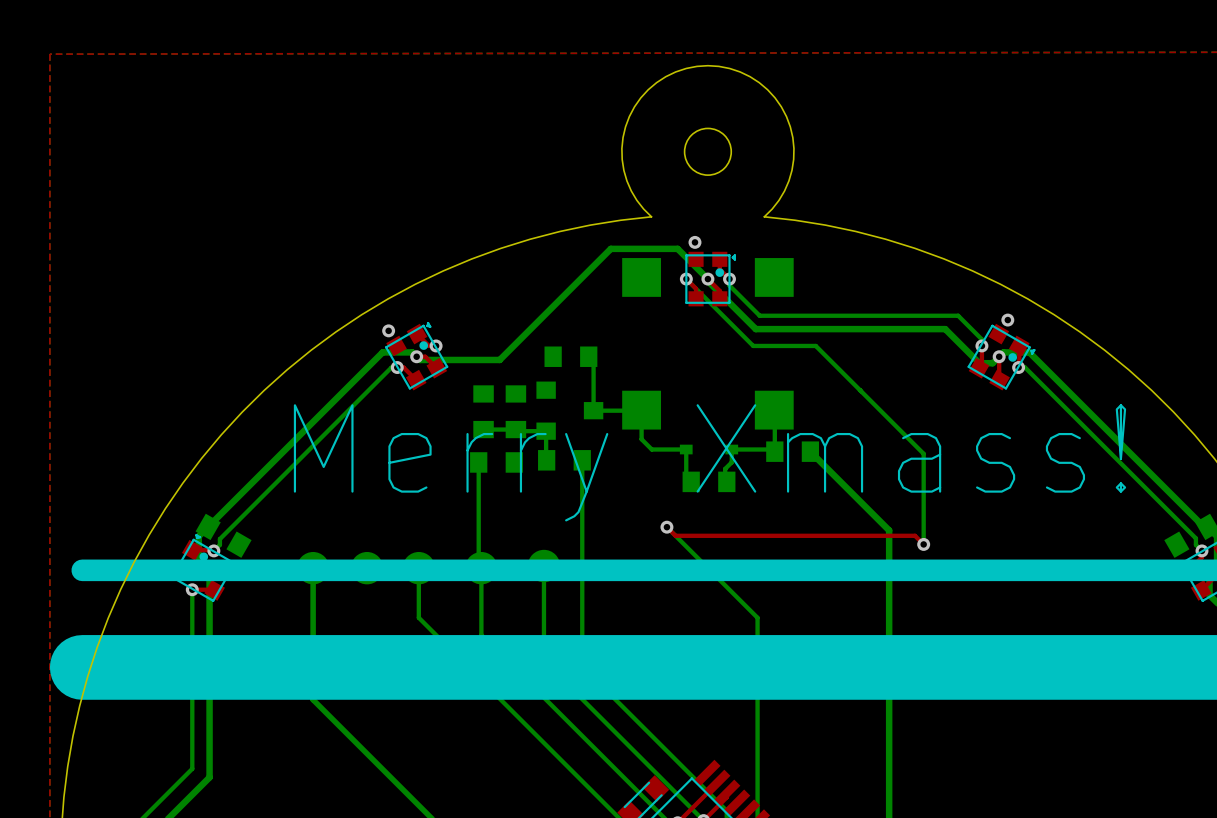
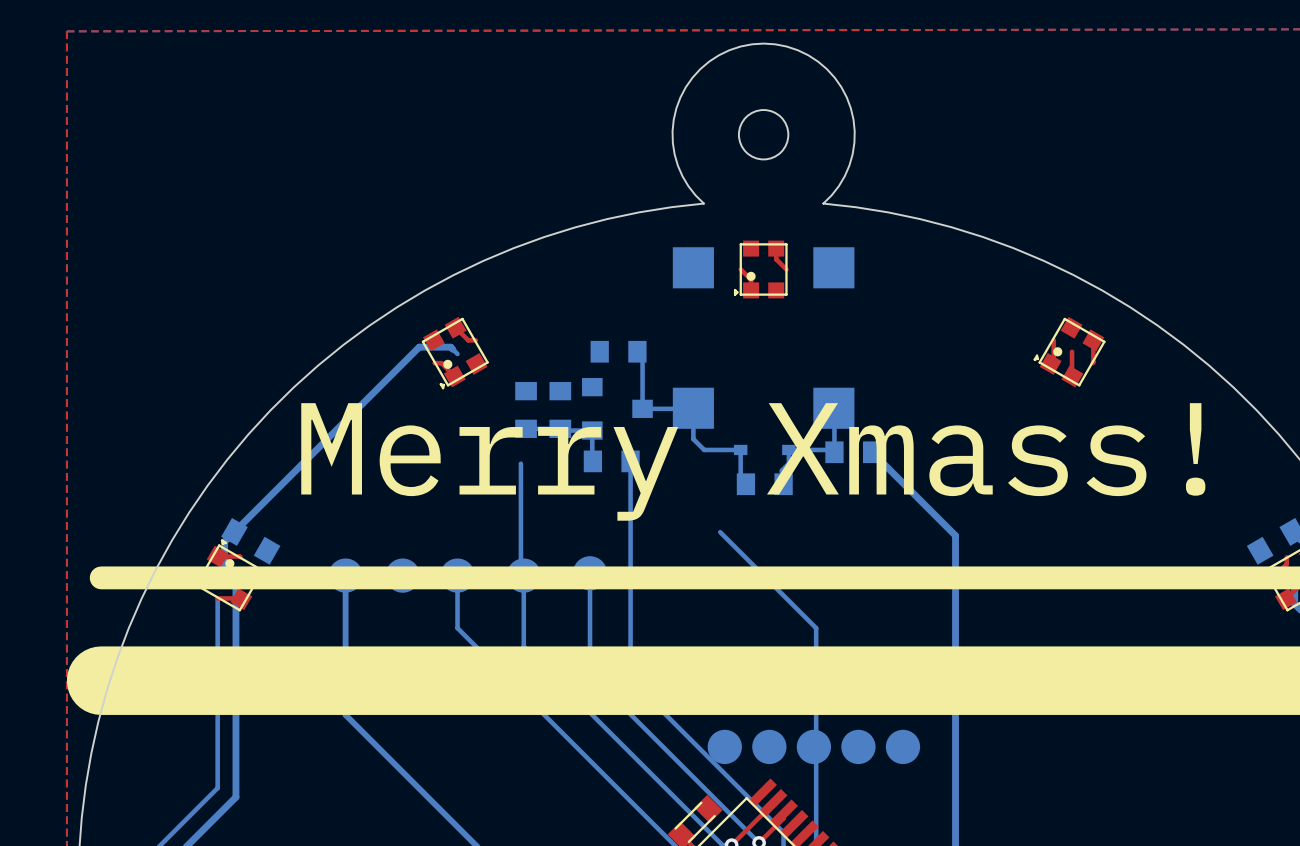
via: (694, 242) -> none
bottom track: (686, 279) (753, 345) (815, 345) (923, 453) (923, 544) -> none
via: (686, 279) -> none
top track: (707, 279) (719, 290) (719, 298) -> none
via: (707, 279) -> none
part rotation: 0° (710, 279) -> 180° (760, 269)
bottom track: (729, 279) (729, 285) (759, 315) (958, 315) (981, 339) (981, 345) -> none
via: (729, 279) -> none
via: (1007, 320) -> none
via: (388, 330) -> none
via: (436, 345) -> none
via: (981, 345) -> none
bottom track: (416, 356) (419, 359) (499, 359) (610, 248) (677, 248) (755, 329) (945, 329) (979, 363) (992, 363) (999, 356) -> none
top track: (416, 356) (425, 356) (436, 368) -> none
part rotation: 0° (416, 356) -> 180° (455, 353)
via: (416, 356) -> none
via: (999, 356) -> none
part rotation: 0° (1001, 357) -> 180° (1069, 352)
bottom track: (997, 358) (1003, 352) (1029, 352) (1203, 526) (1207, 526) -> none
bottom track: (397, 367) (391, 367) (219, 539) (219, 544) (213, 550) -> none
via: (397, 367) -> none
bottom track: (1018, 367) (1025, 367) (1195, 538) (1195, 544) (1201, 550) -> none
via: (1018, 367) -> none
part: (496, 462) -> none
top track: (666, 527) (675, 535) (915, 535) (923, 544) -> none
via: (666, 527) -> none
via: (923, 544) -> none
via: (213, 550) -> none
via: (1201, 550) -> none
via: (192, 589) -> none
part: none -> (724, 746)
part: none -> (769, 746)
part: none -> (813, 746)
part: none -> (858, 746)
part: none -> (902, 746)

